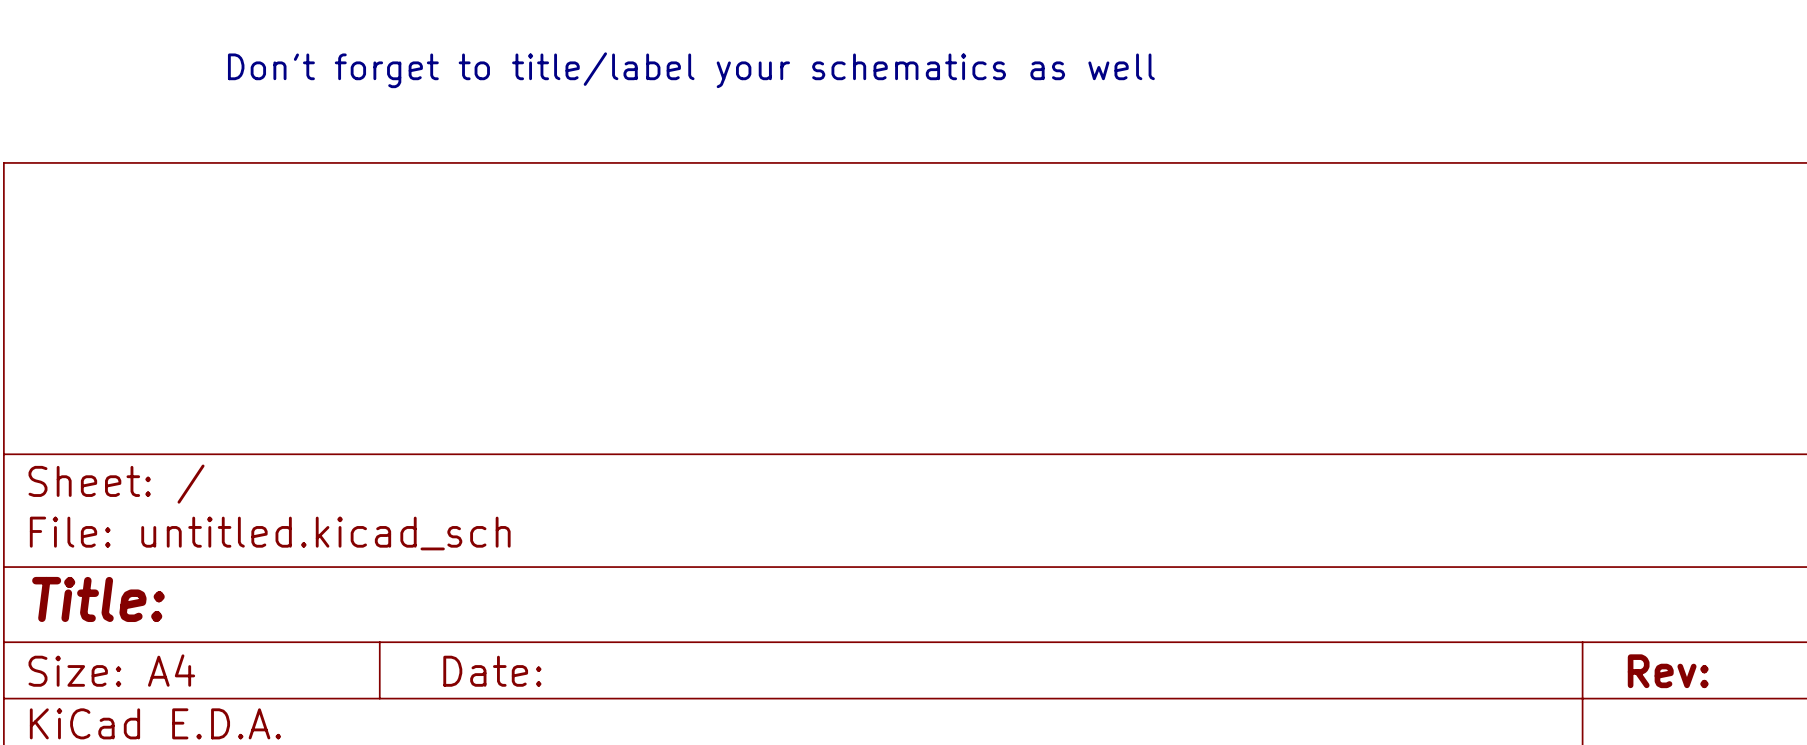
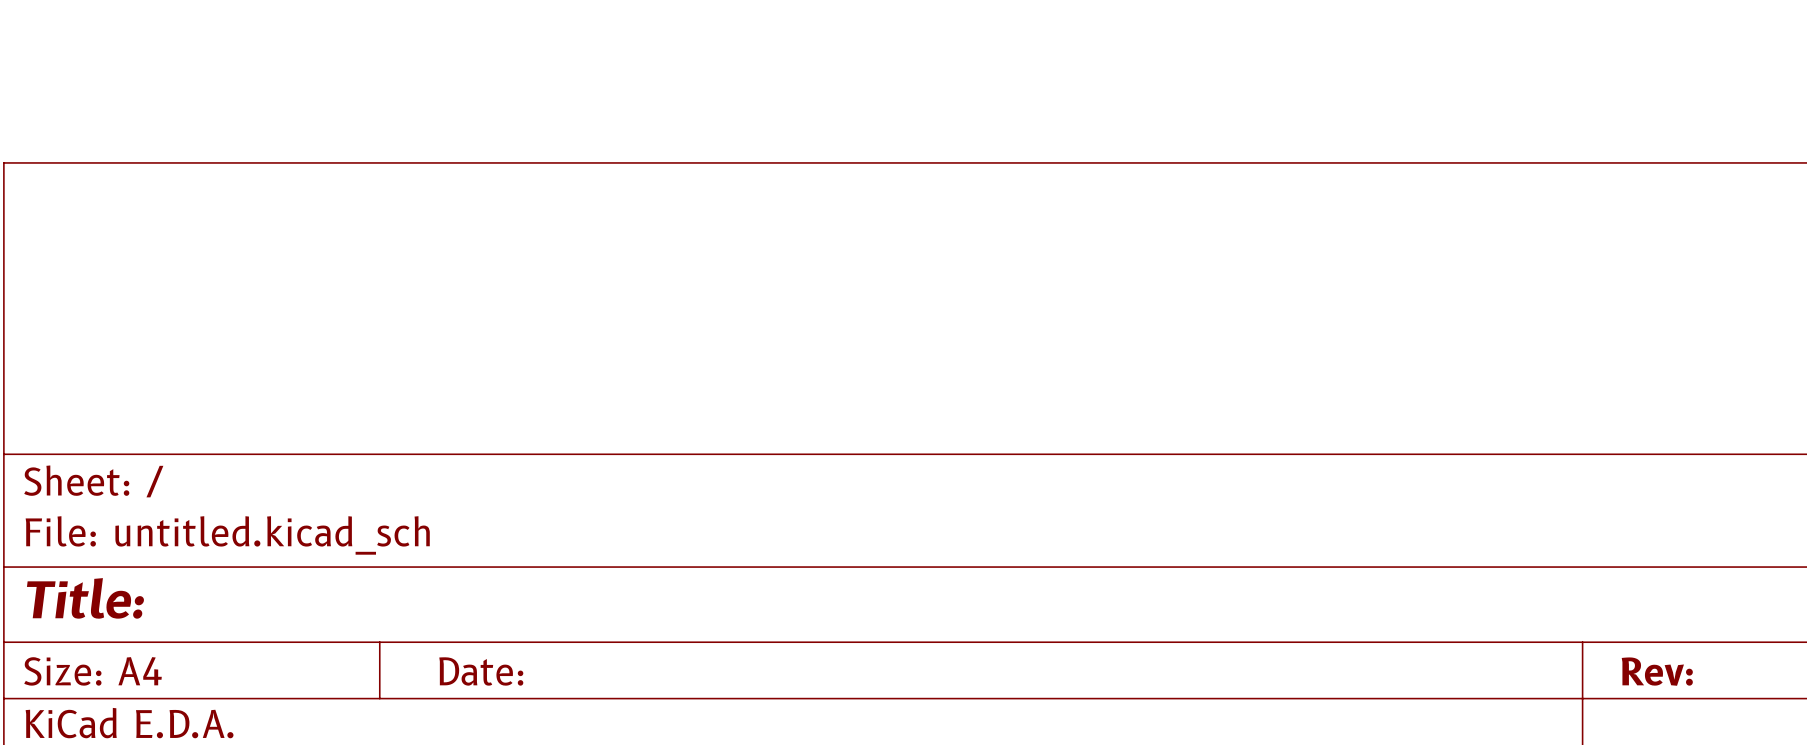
text: Don't forget to title/label your schematics as well (691, 70) -> none

